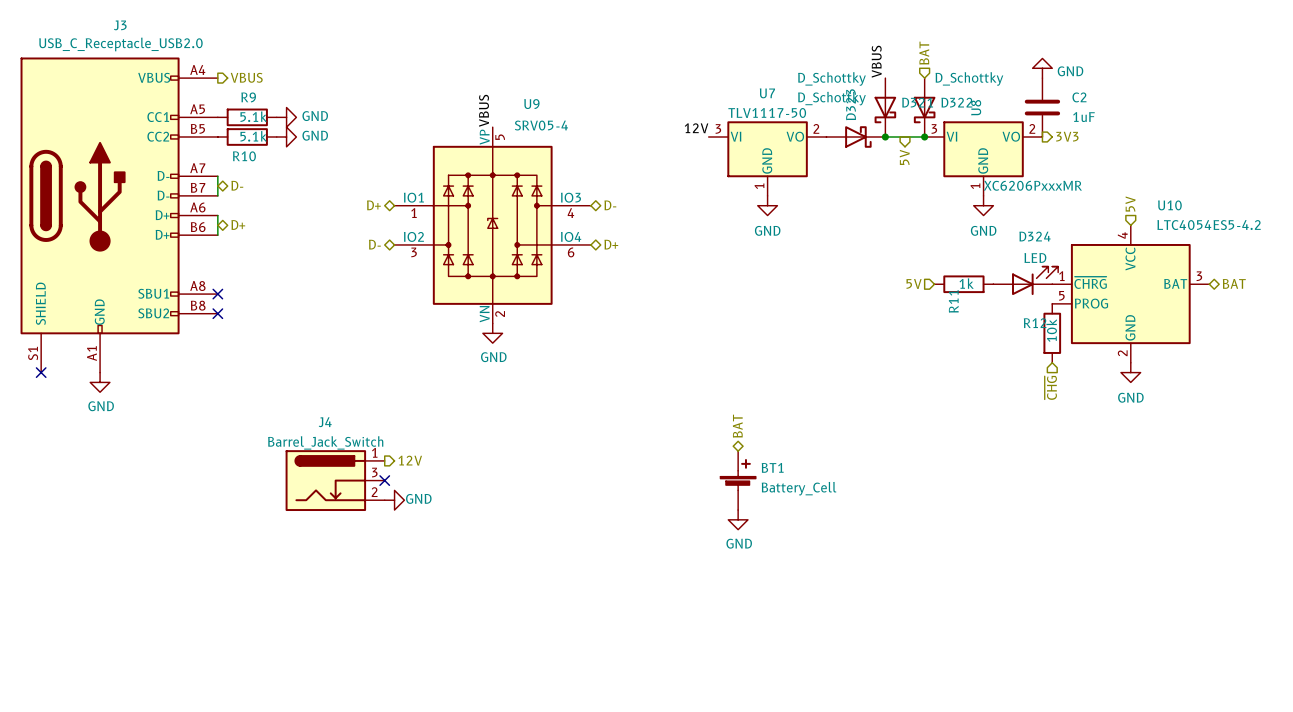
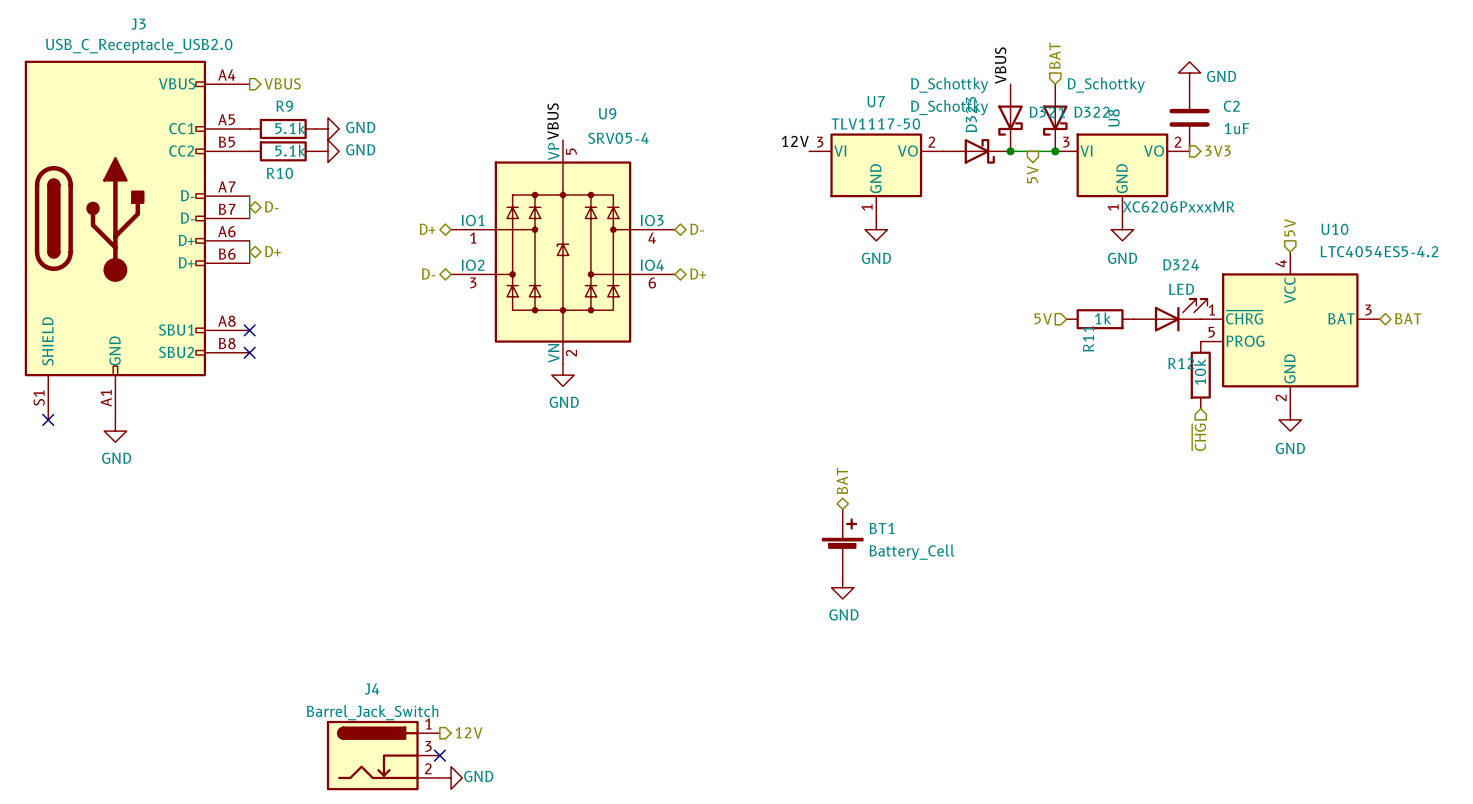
J4 symbol: [285, 450, 385, 512] -> [326, 720, 440, 791]
hierarchical label position: 12V (410, 460) -> 12V (468, 732)
no-connect mark: (384, 480) -> none
power symbol position: GND (394, 500) -> GND (451, 777)
no-connect mark: none -> (439, 755)

